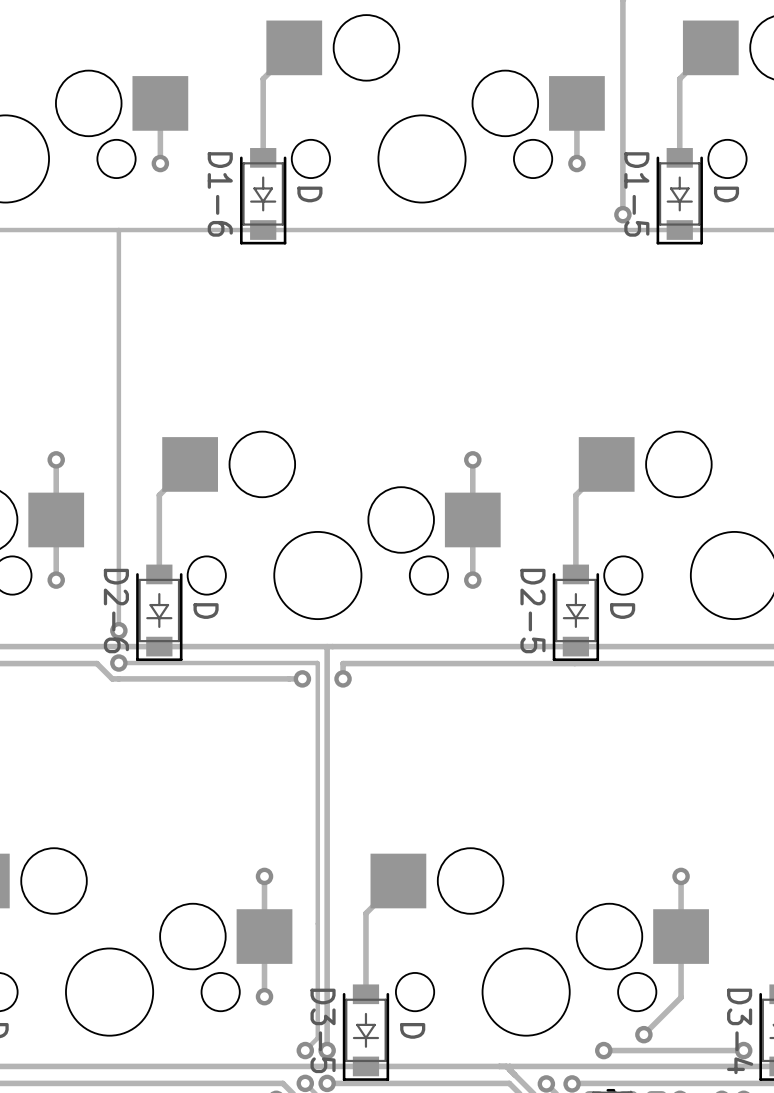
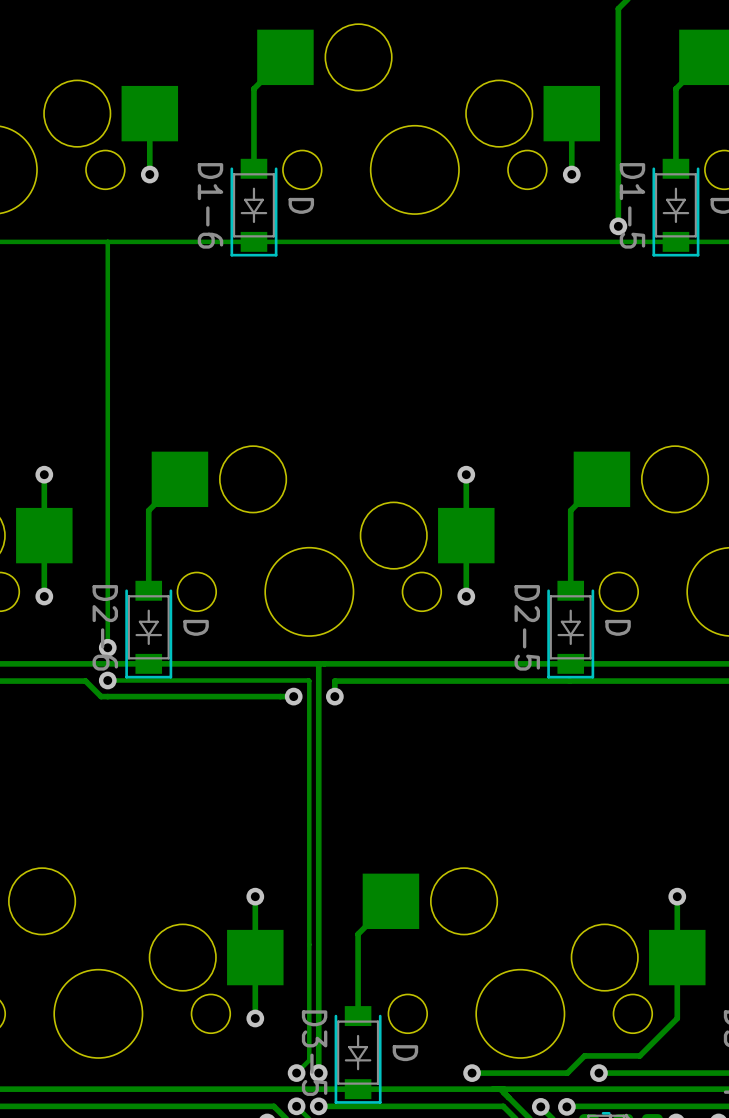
track: (681, 996) (643, 1034) -> (677, 1018) (639, 1055) (584, 1055) (567, 1073) (472, 1073)
via: (643, 1034) -> none
via: none -> (472, 1073)

